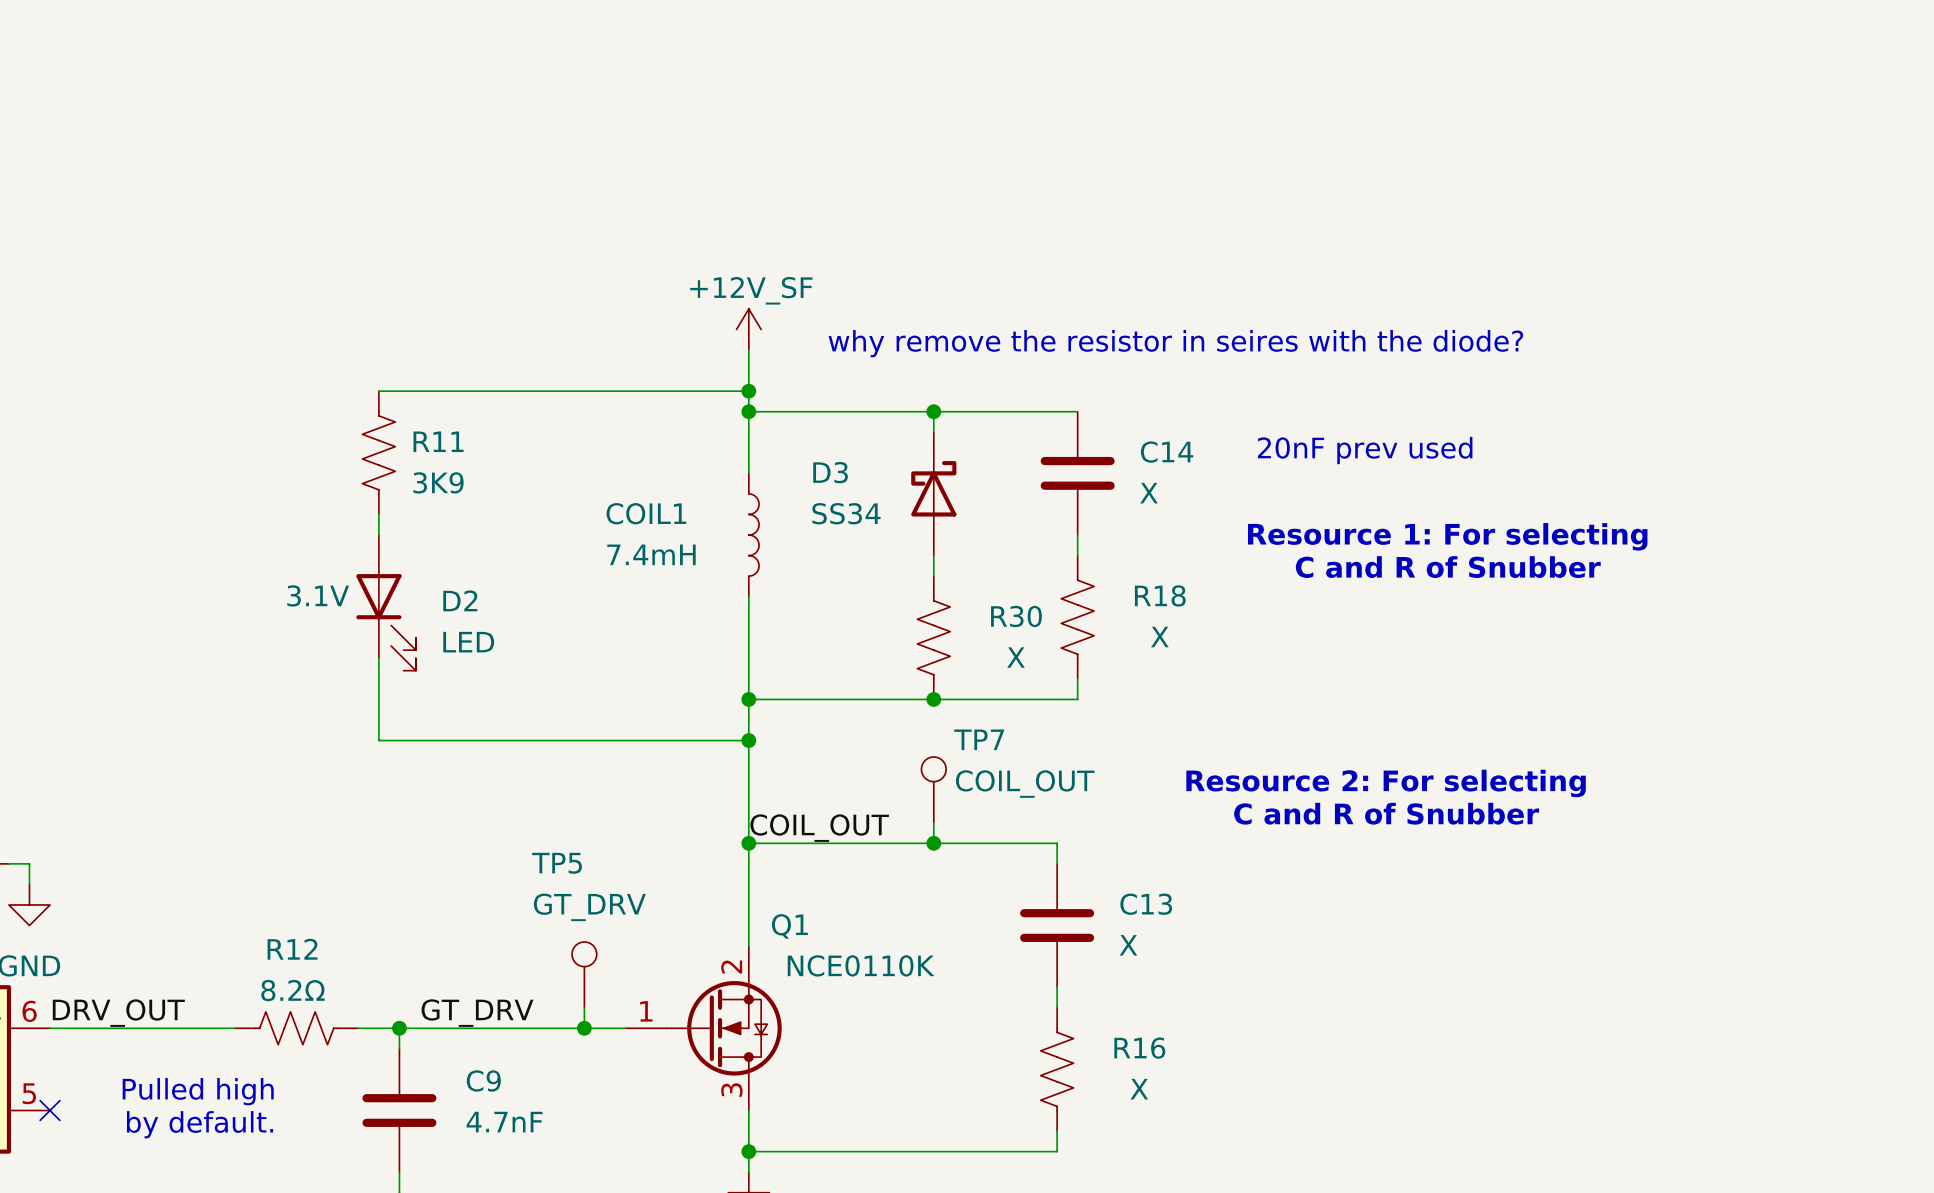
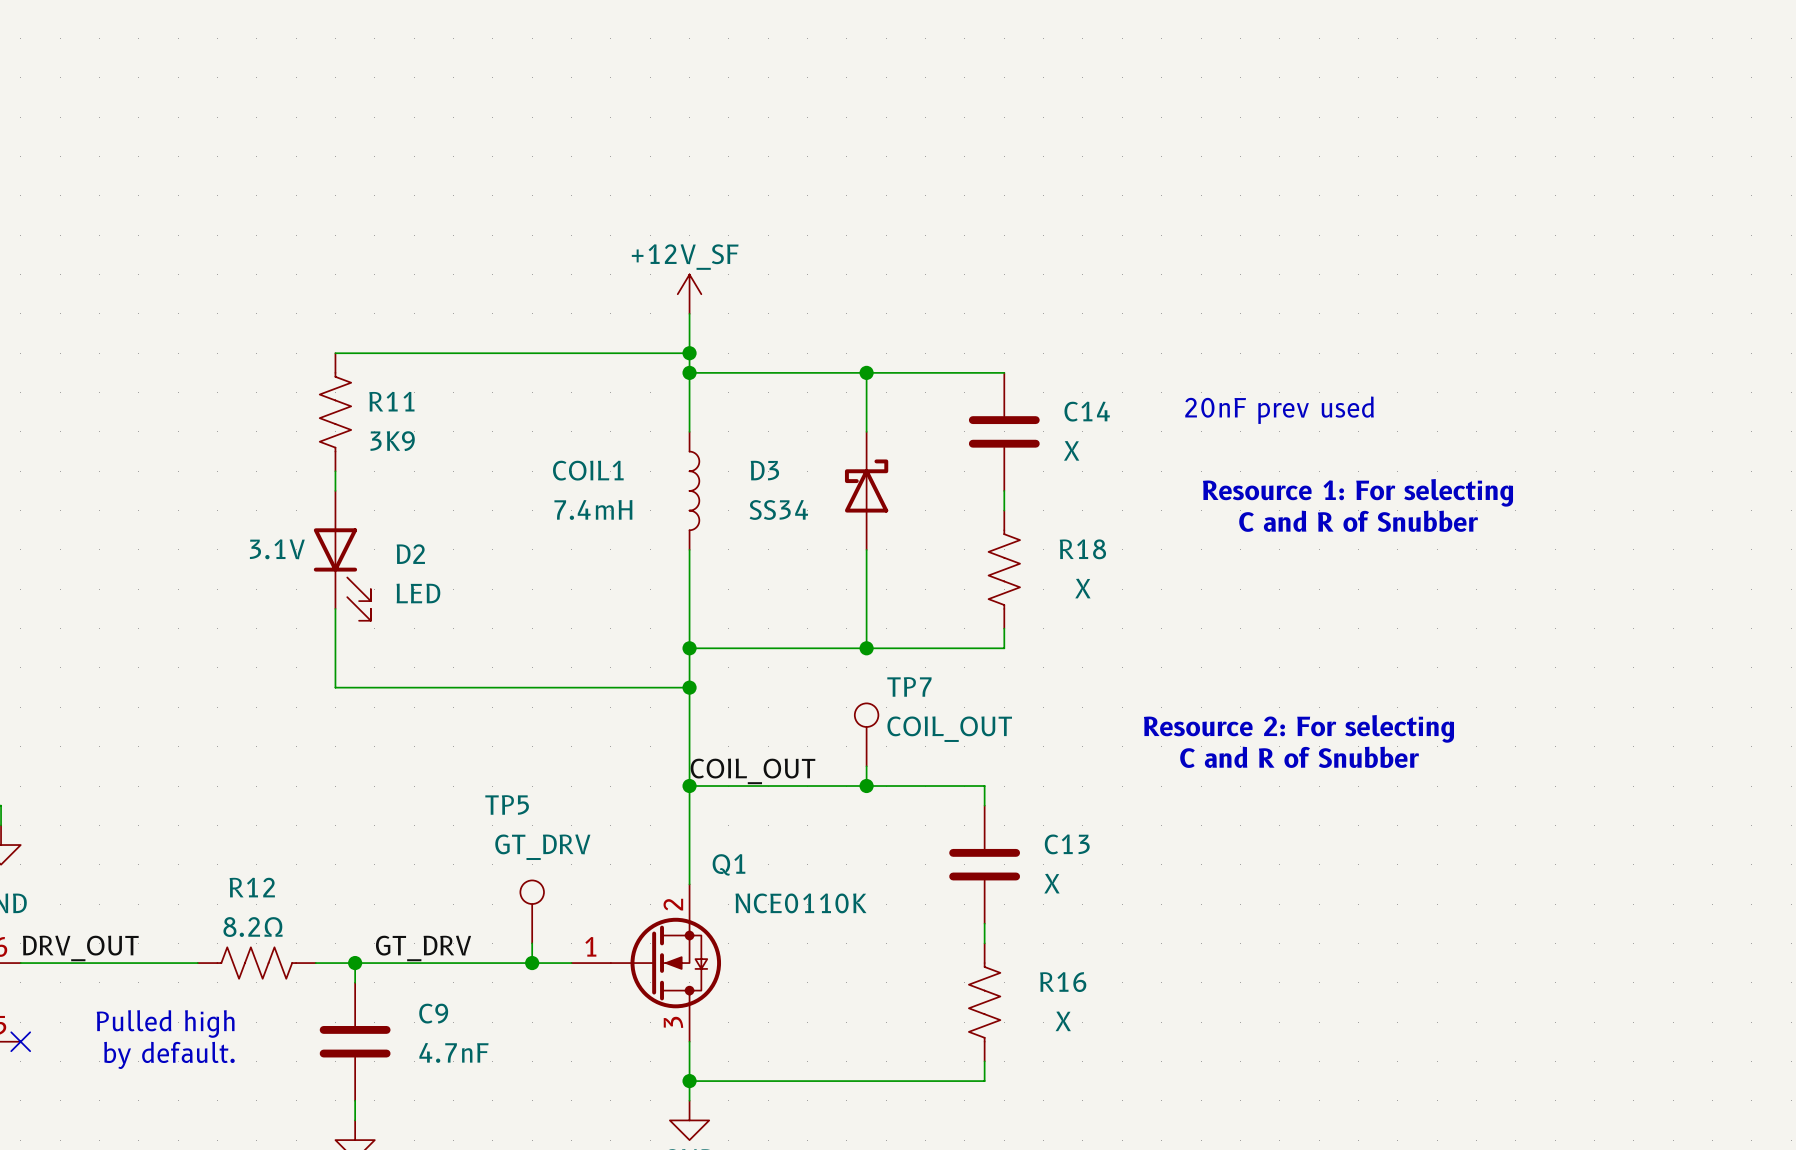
text: why remove the resistor in seires with the diode? (1175, 343) -> none
D3 position: (933, 493) -> (866, 490)
wire: none -> (866, 549) (866, 648)
R30: X (933, 637) -> none

